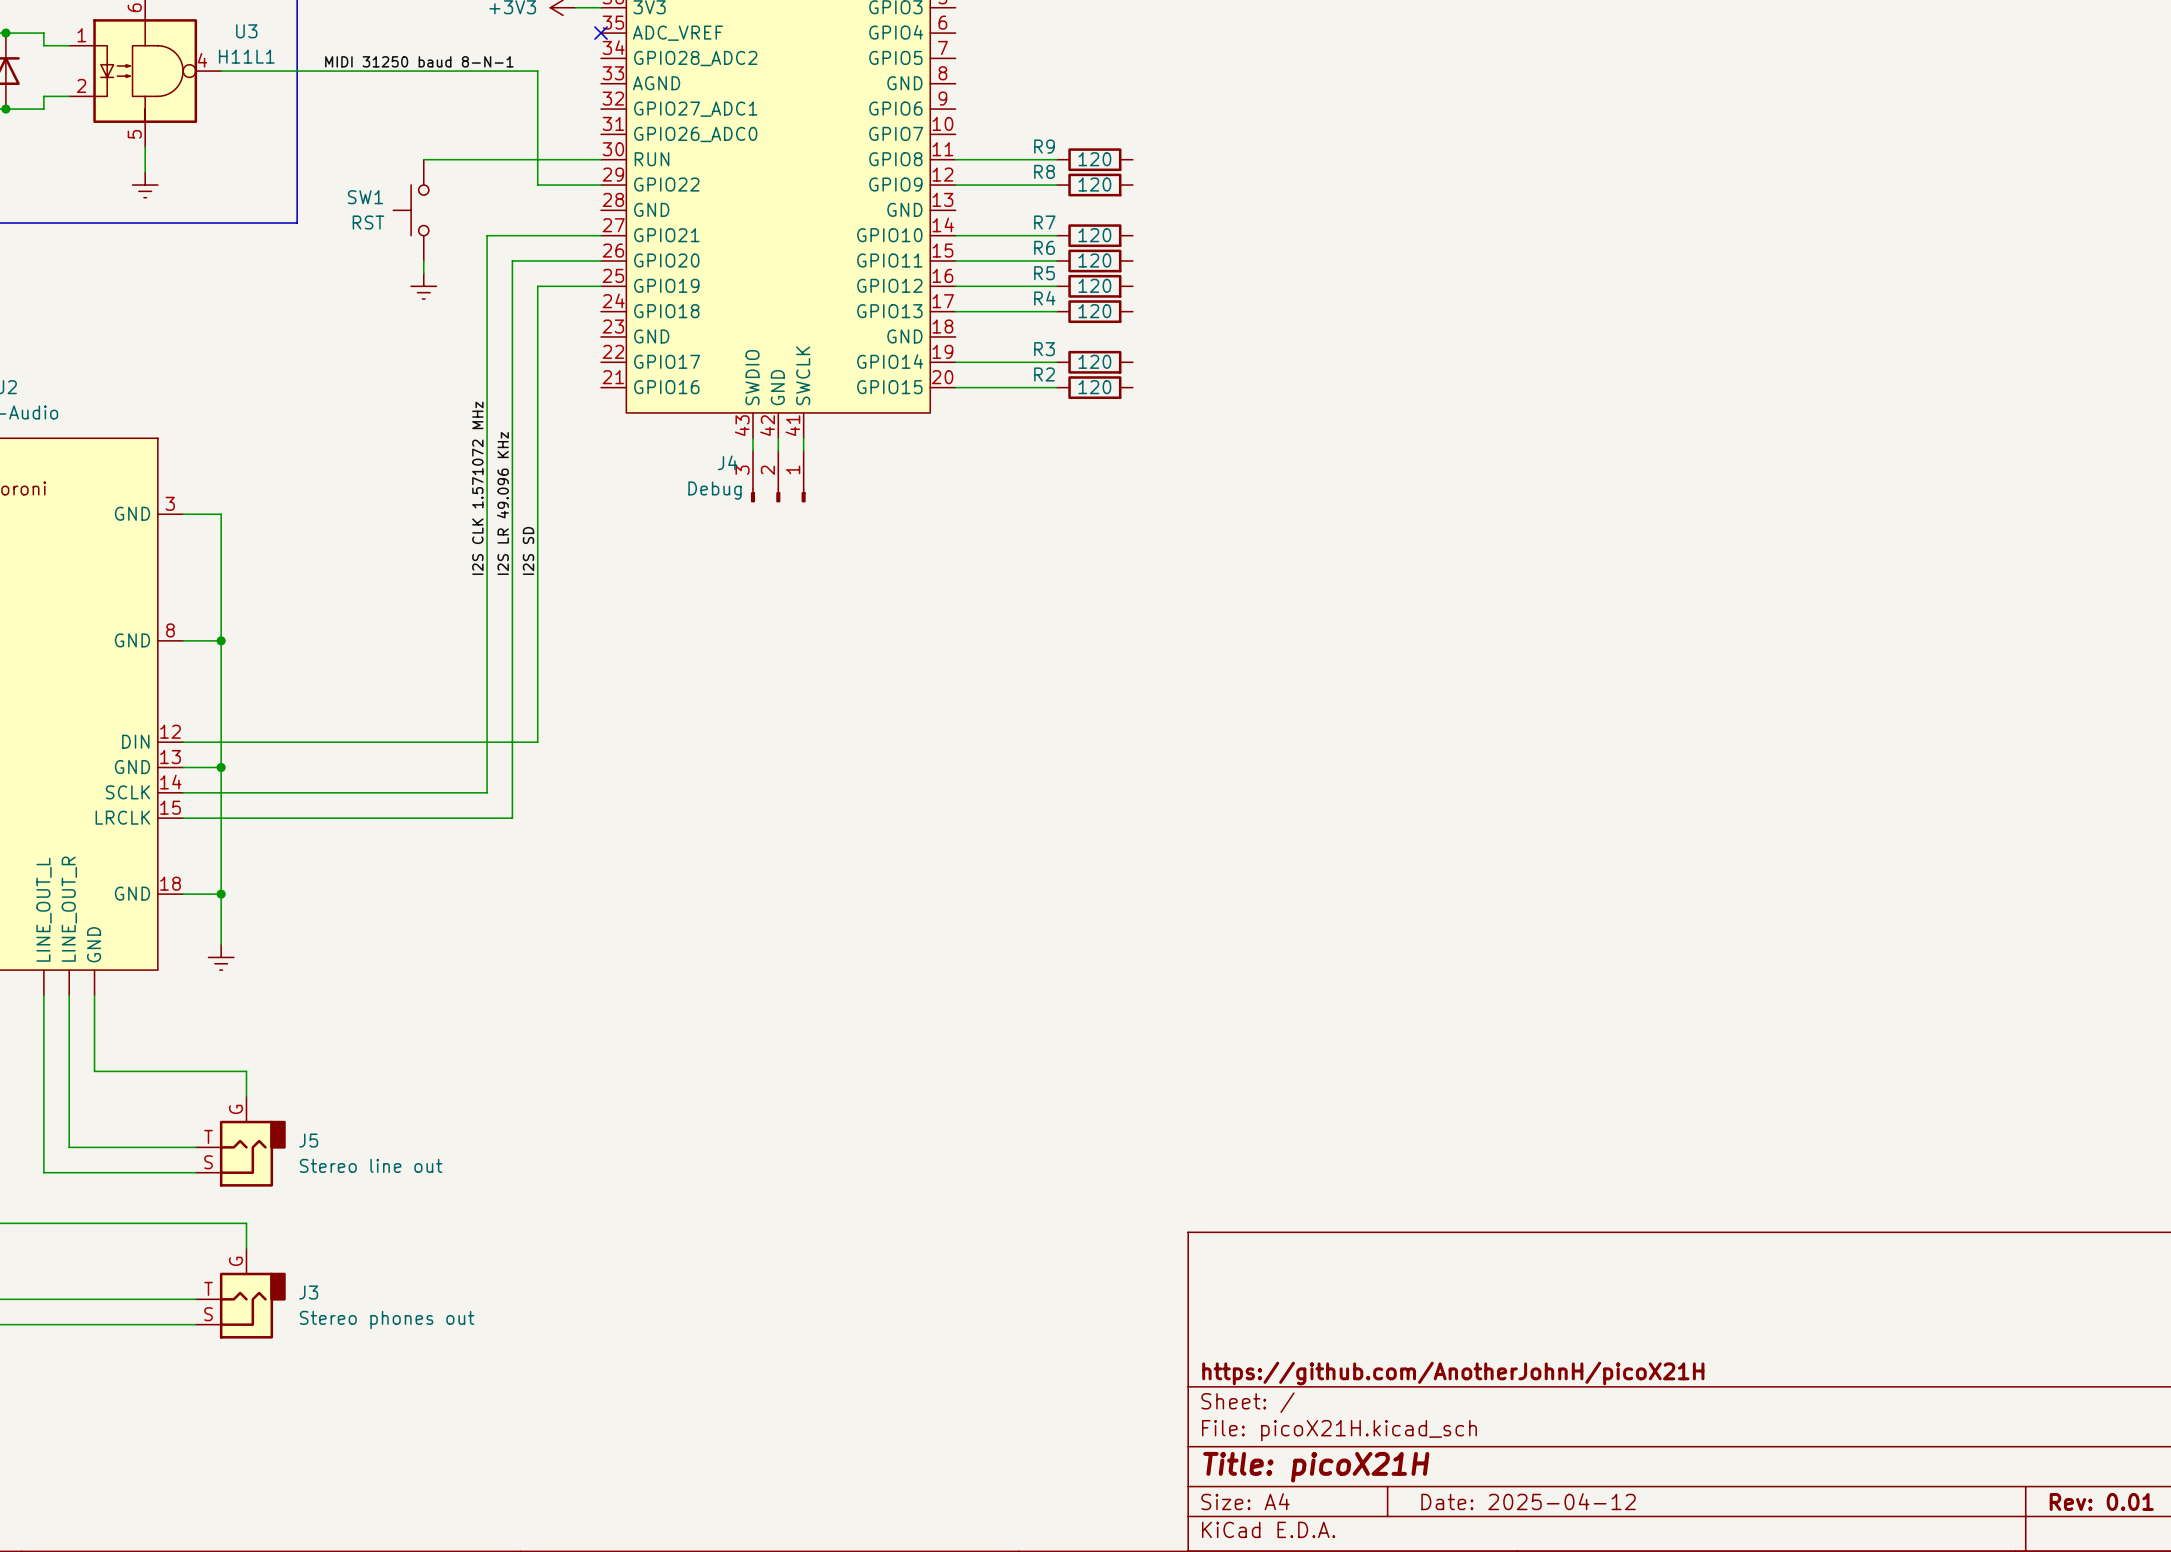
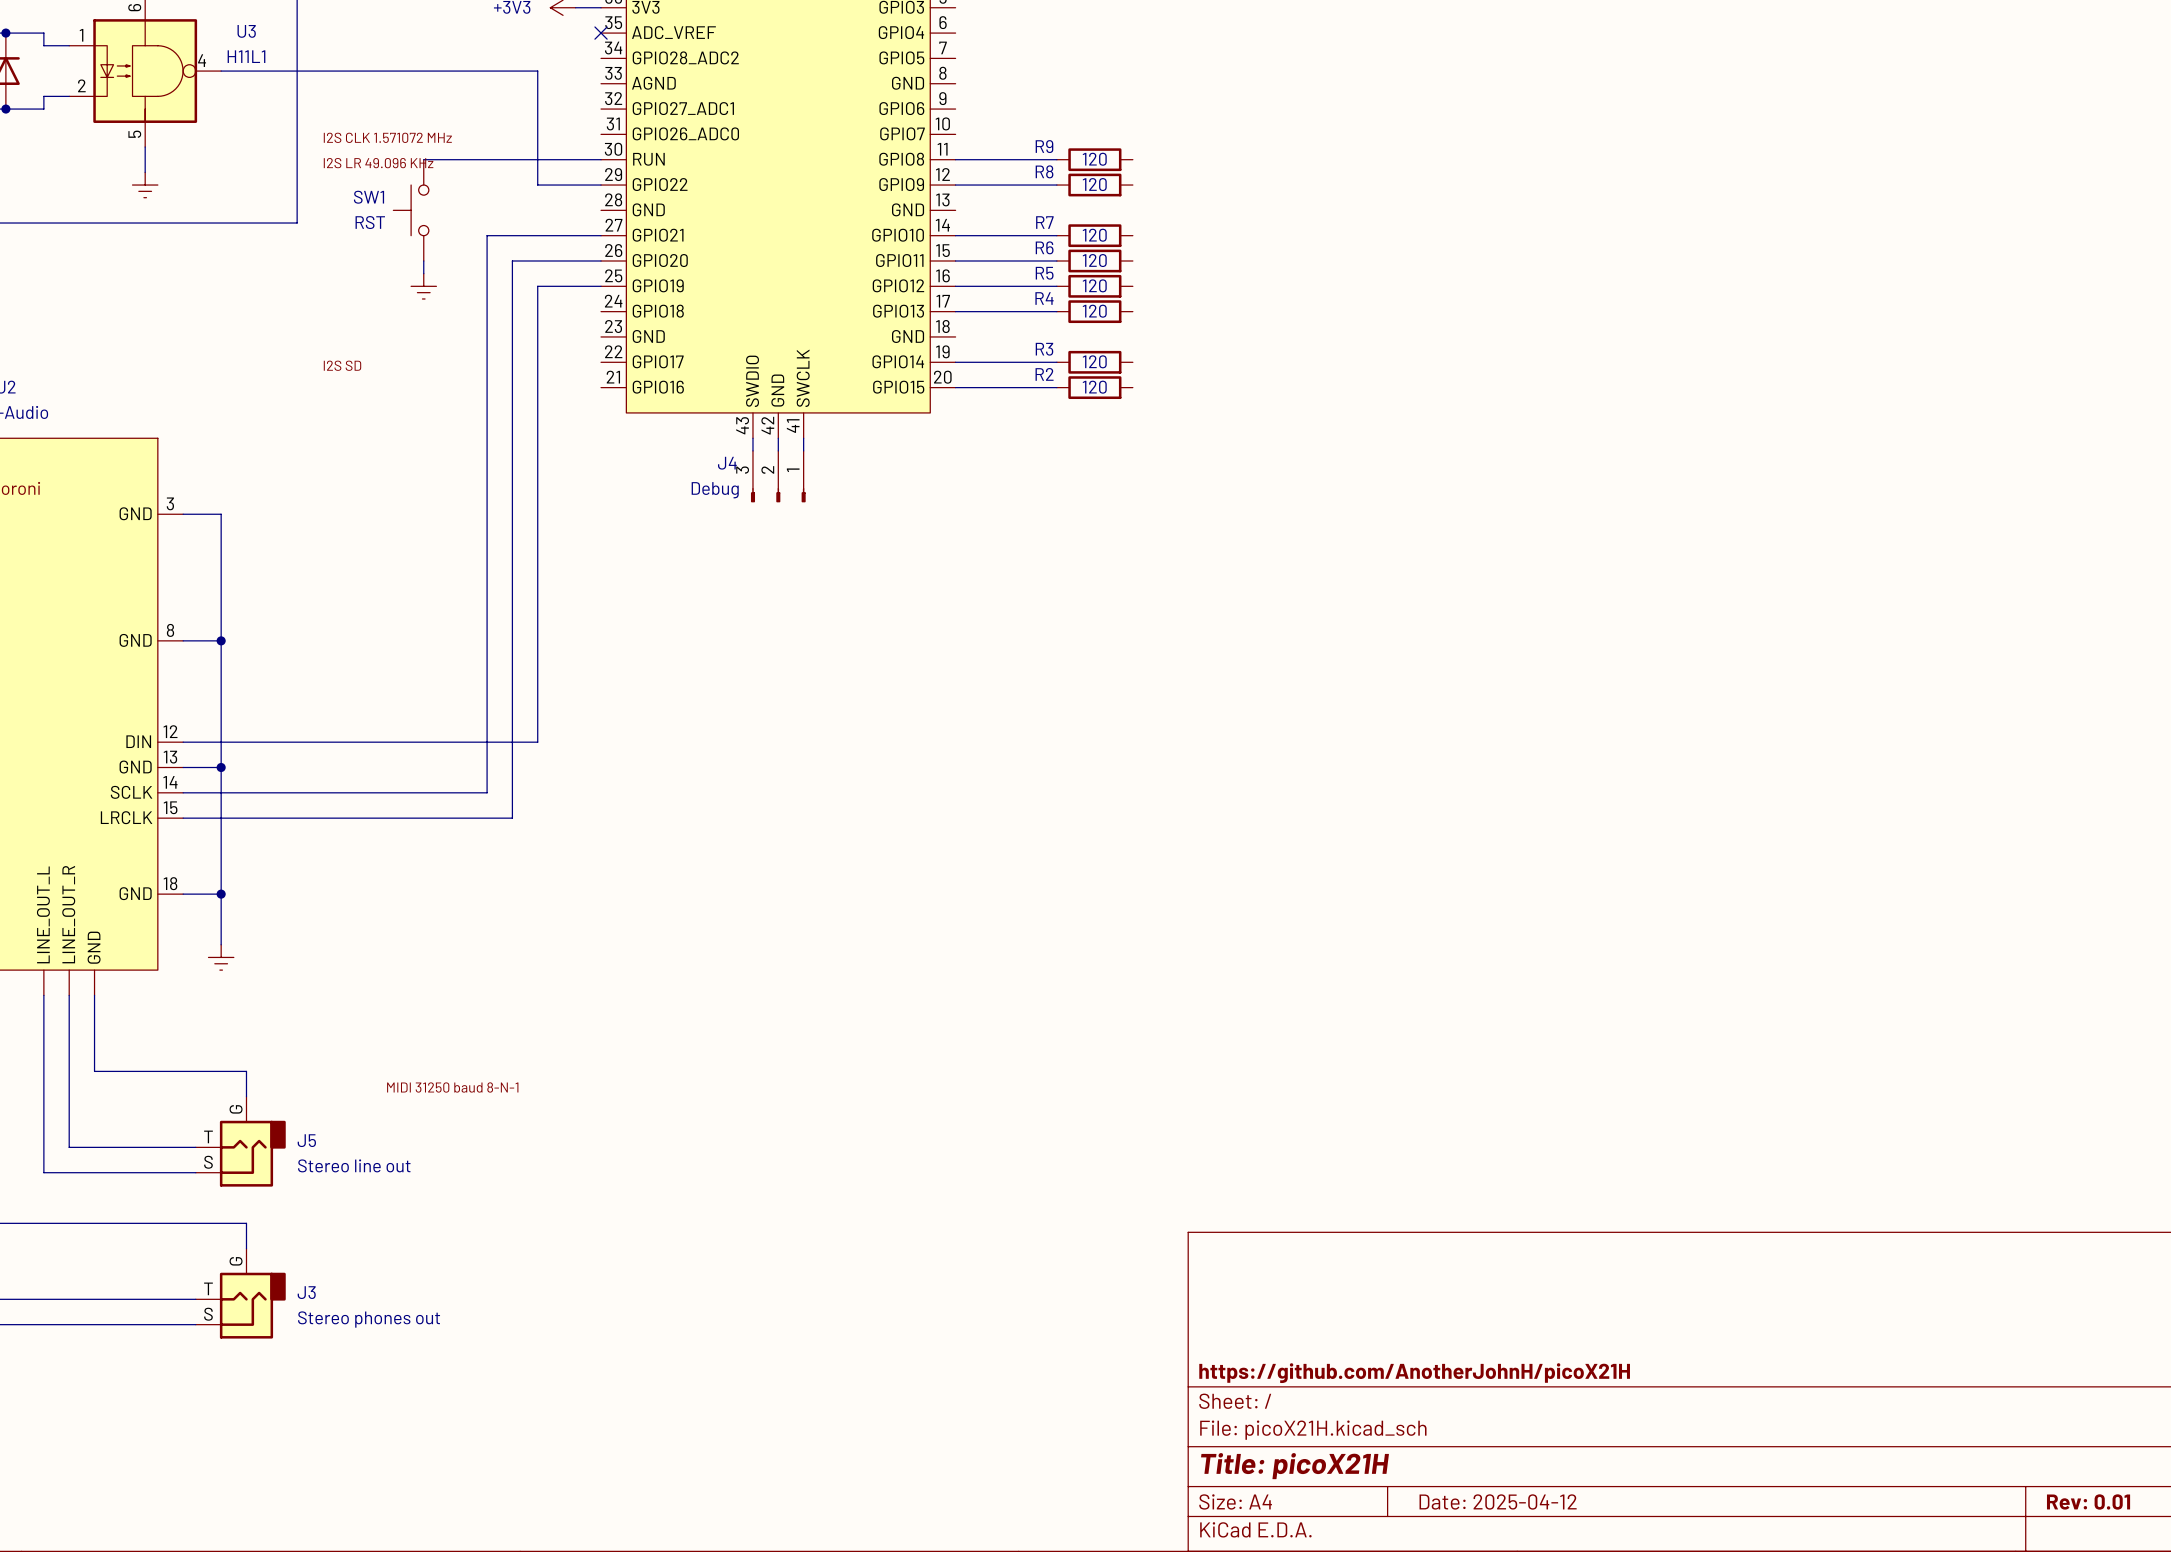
label: MIDI 31250 baud 8-N-1 (419, 61) -> none
label: none -> I2S CLK 1.571072 MHz (387, 137)
label: none -> I2S LR 49.096 KHz (378, 163)
label: none -> I2S SD (342, 365)
label: I2S CLK 1.571072 MHz (477, 488) -> none
label: I2S LR 49.096 KHz (502, 503) -> none
label: I2S SD (528, 550) -> none
label: none -> MIDI 31250 baud 8-N-1 (452, 1087)

